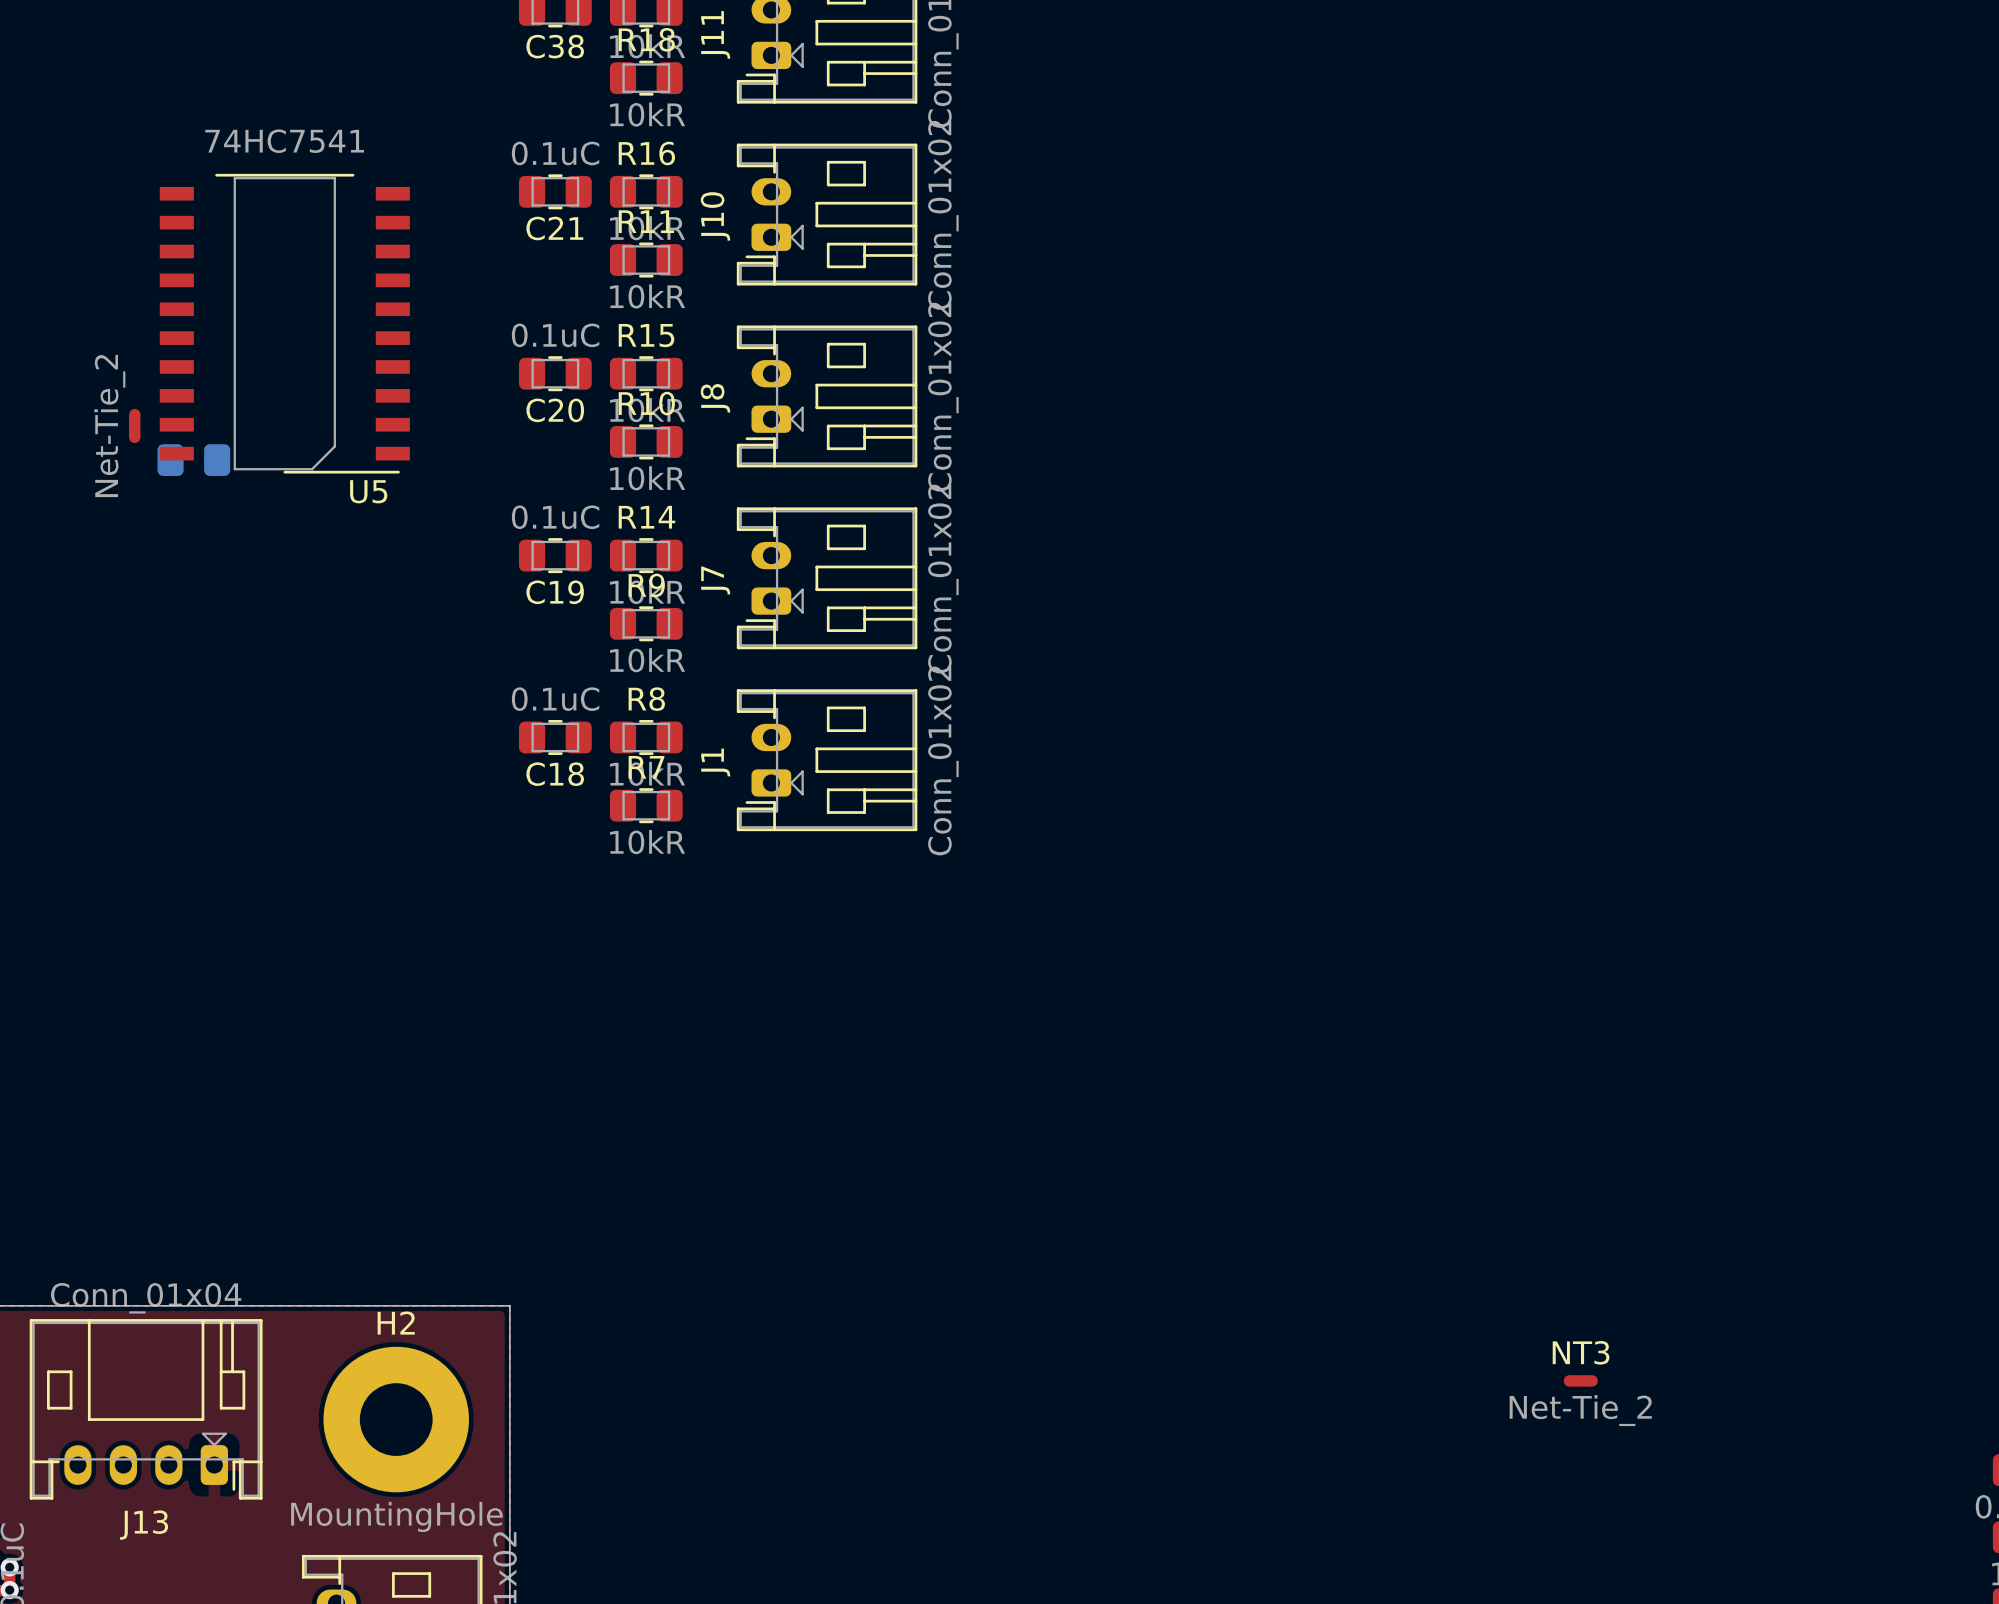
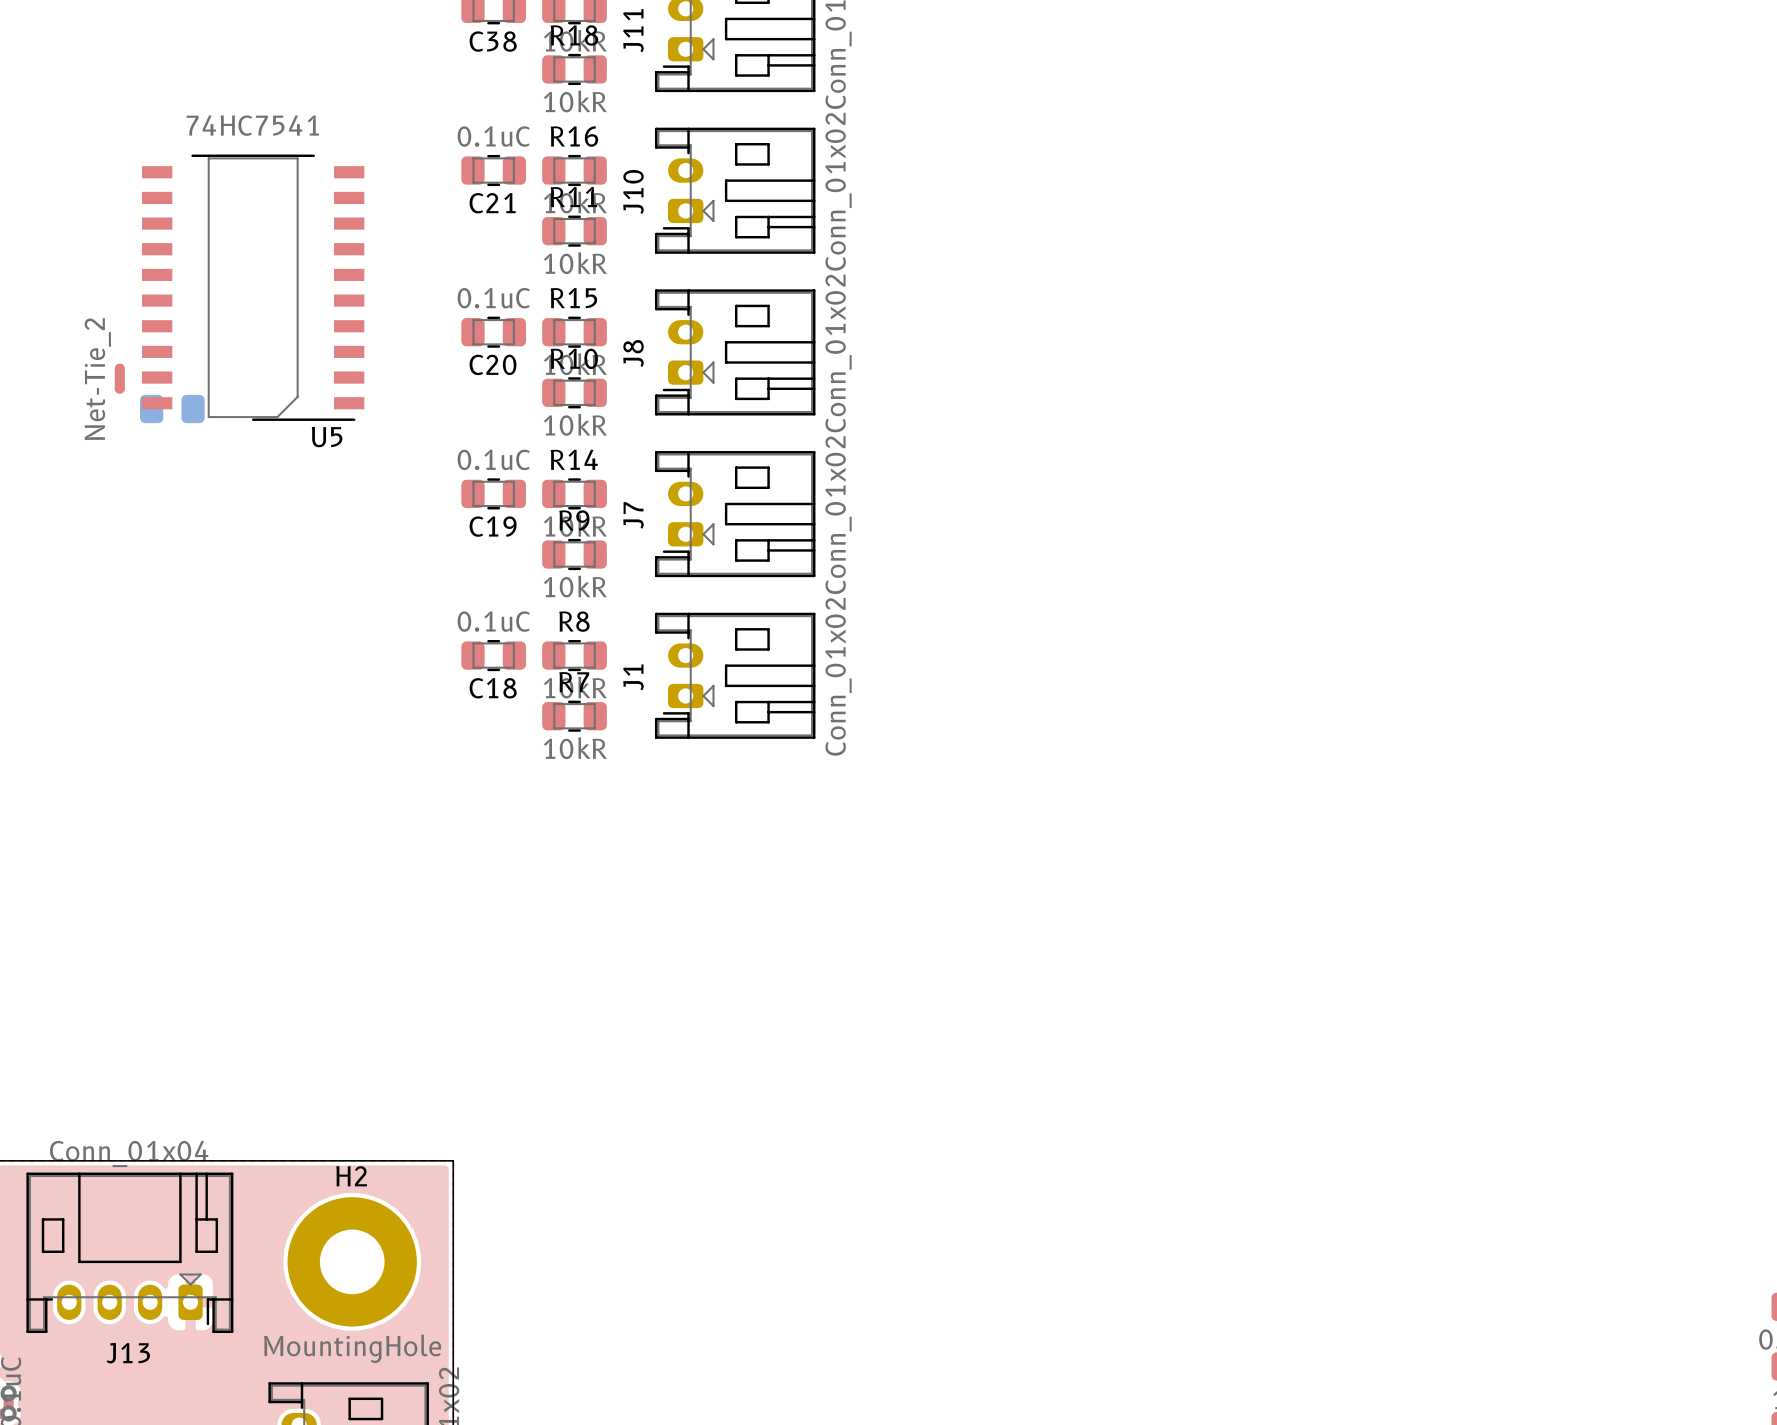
NT3: Net-Tie_2 (1580, 1380) -> none

